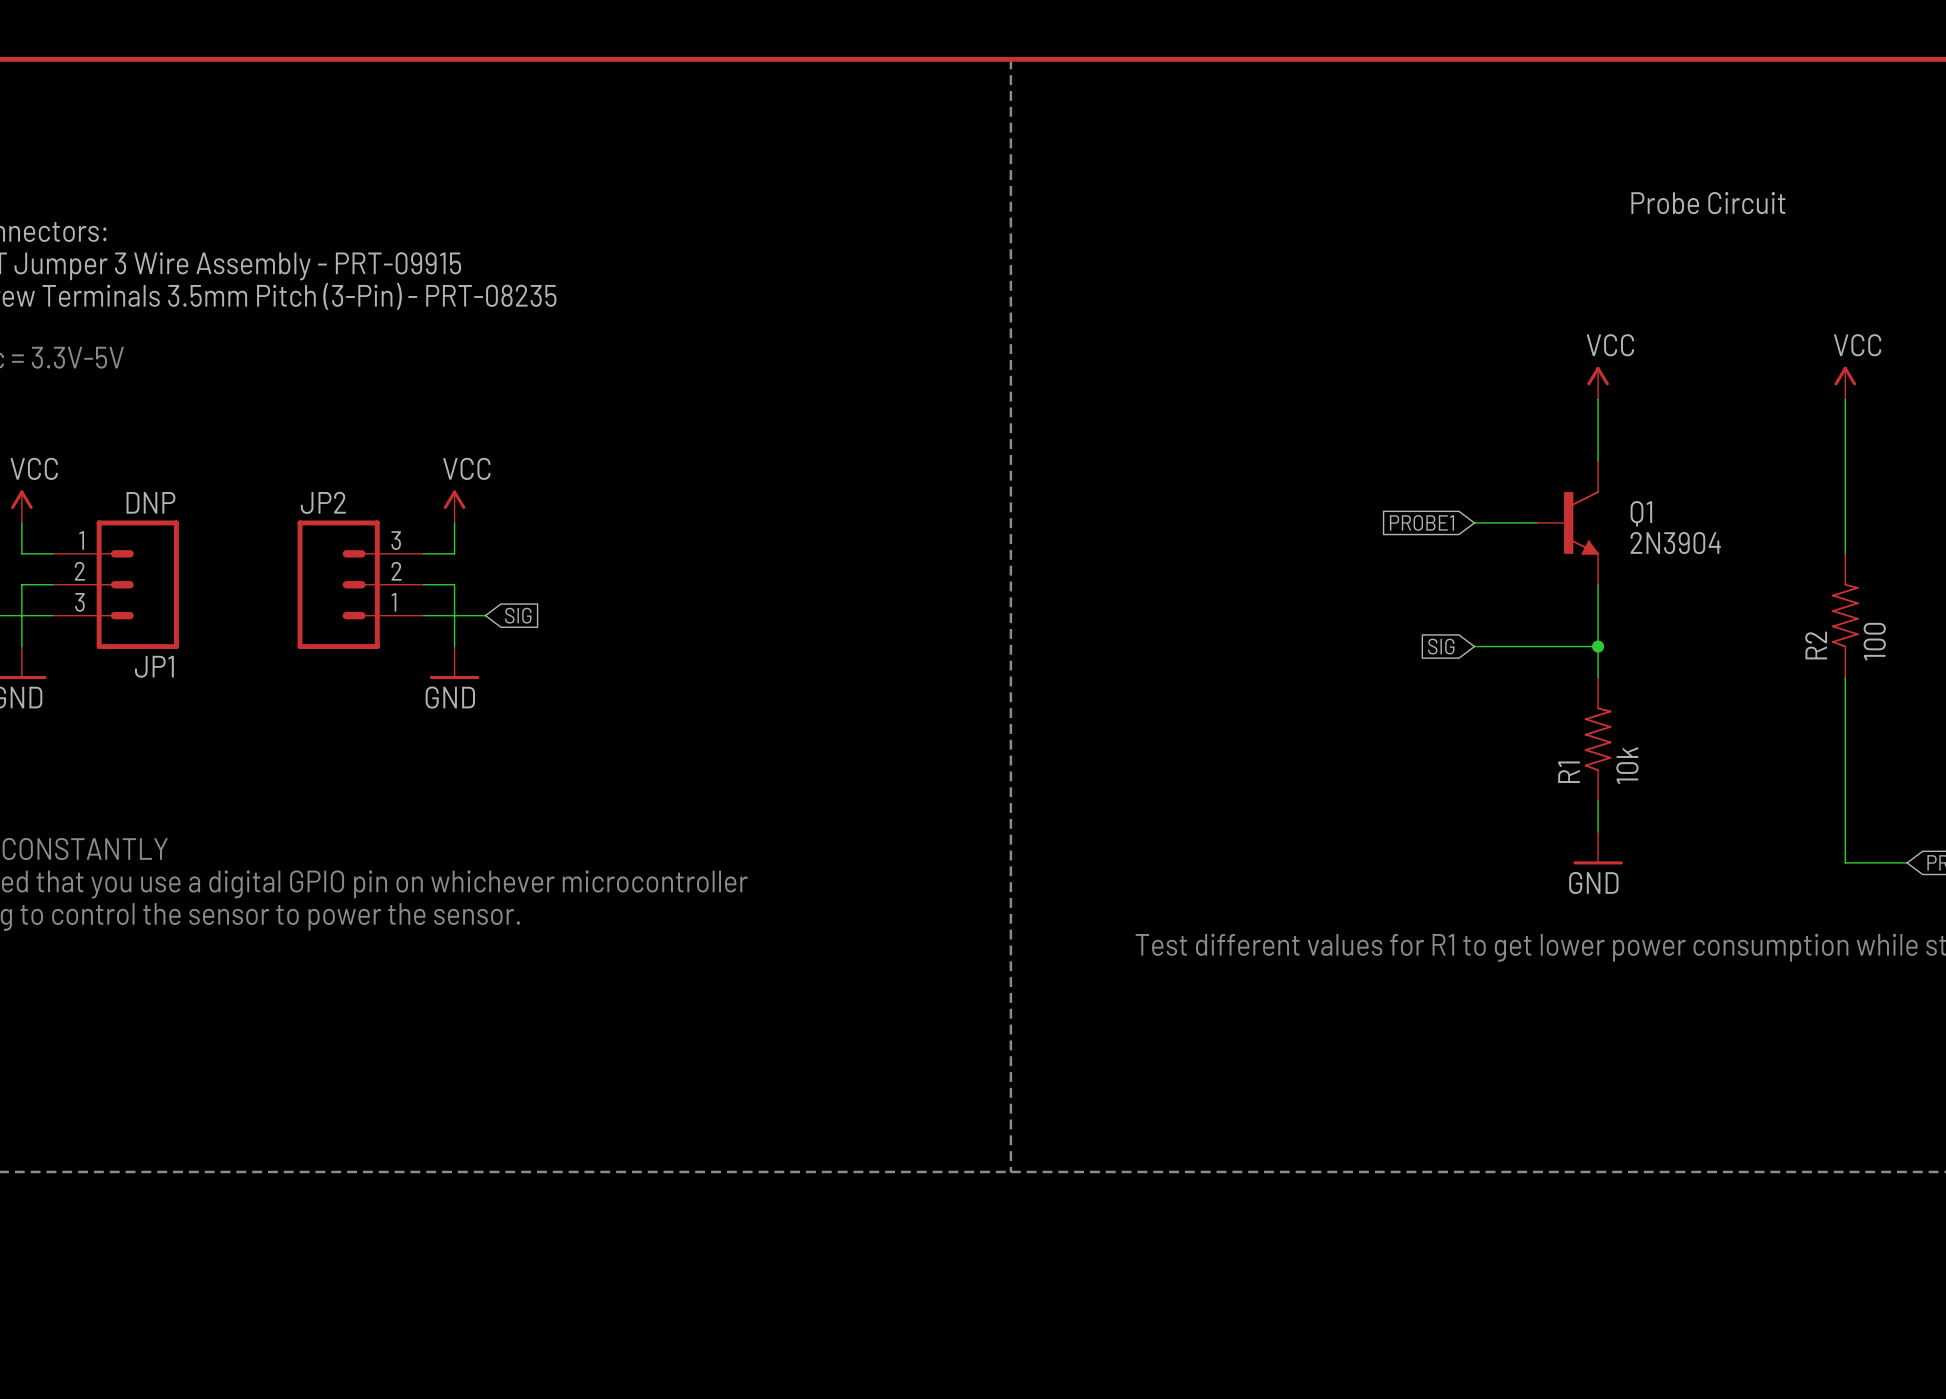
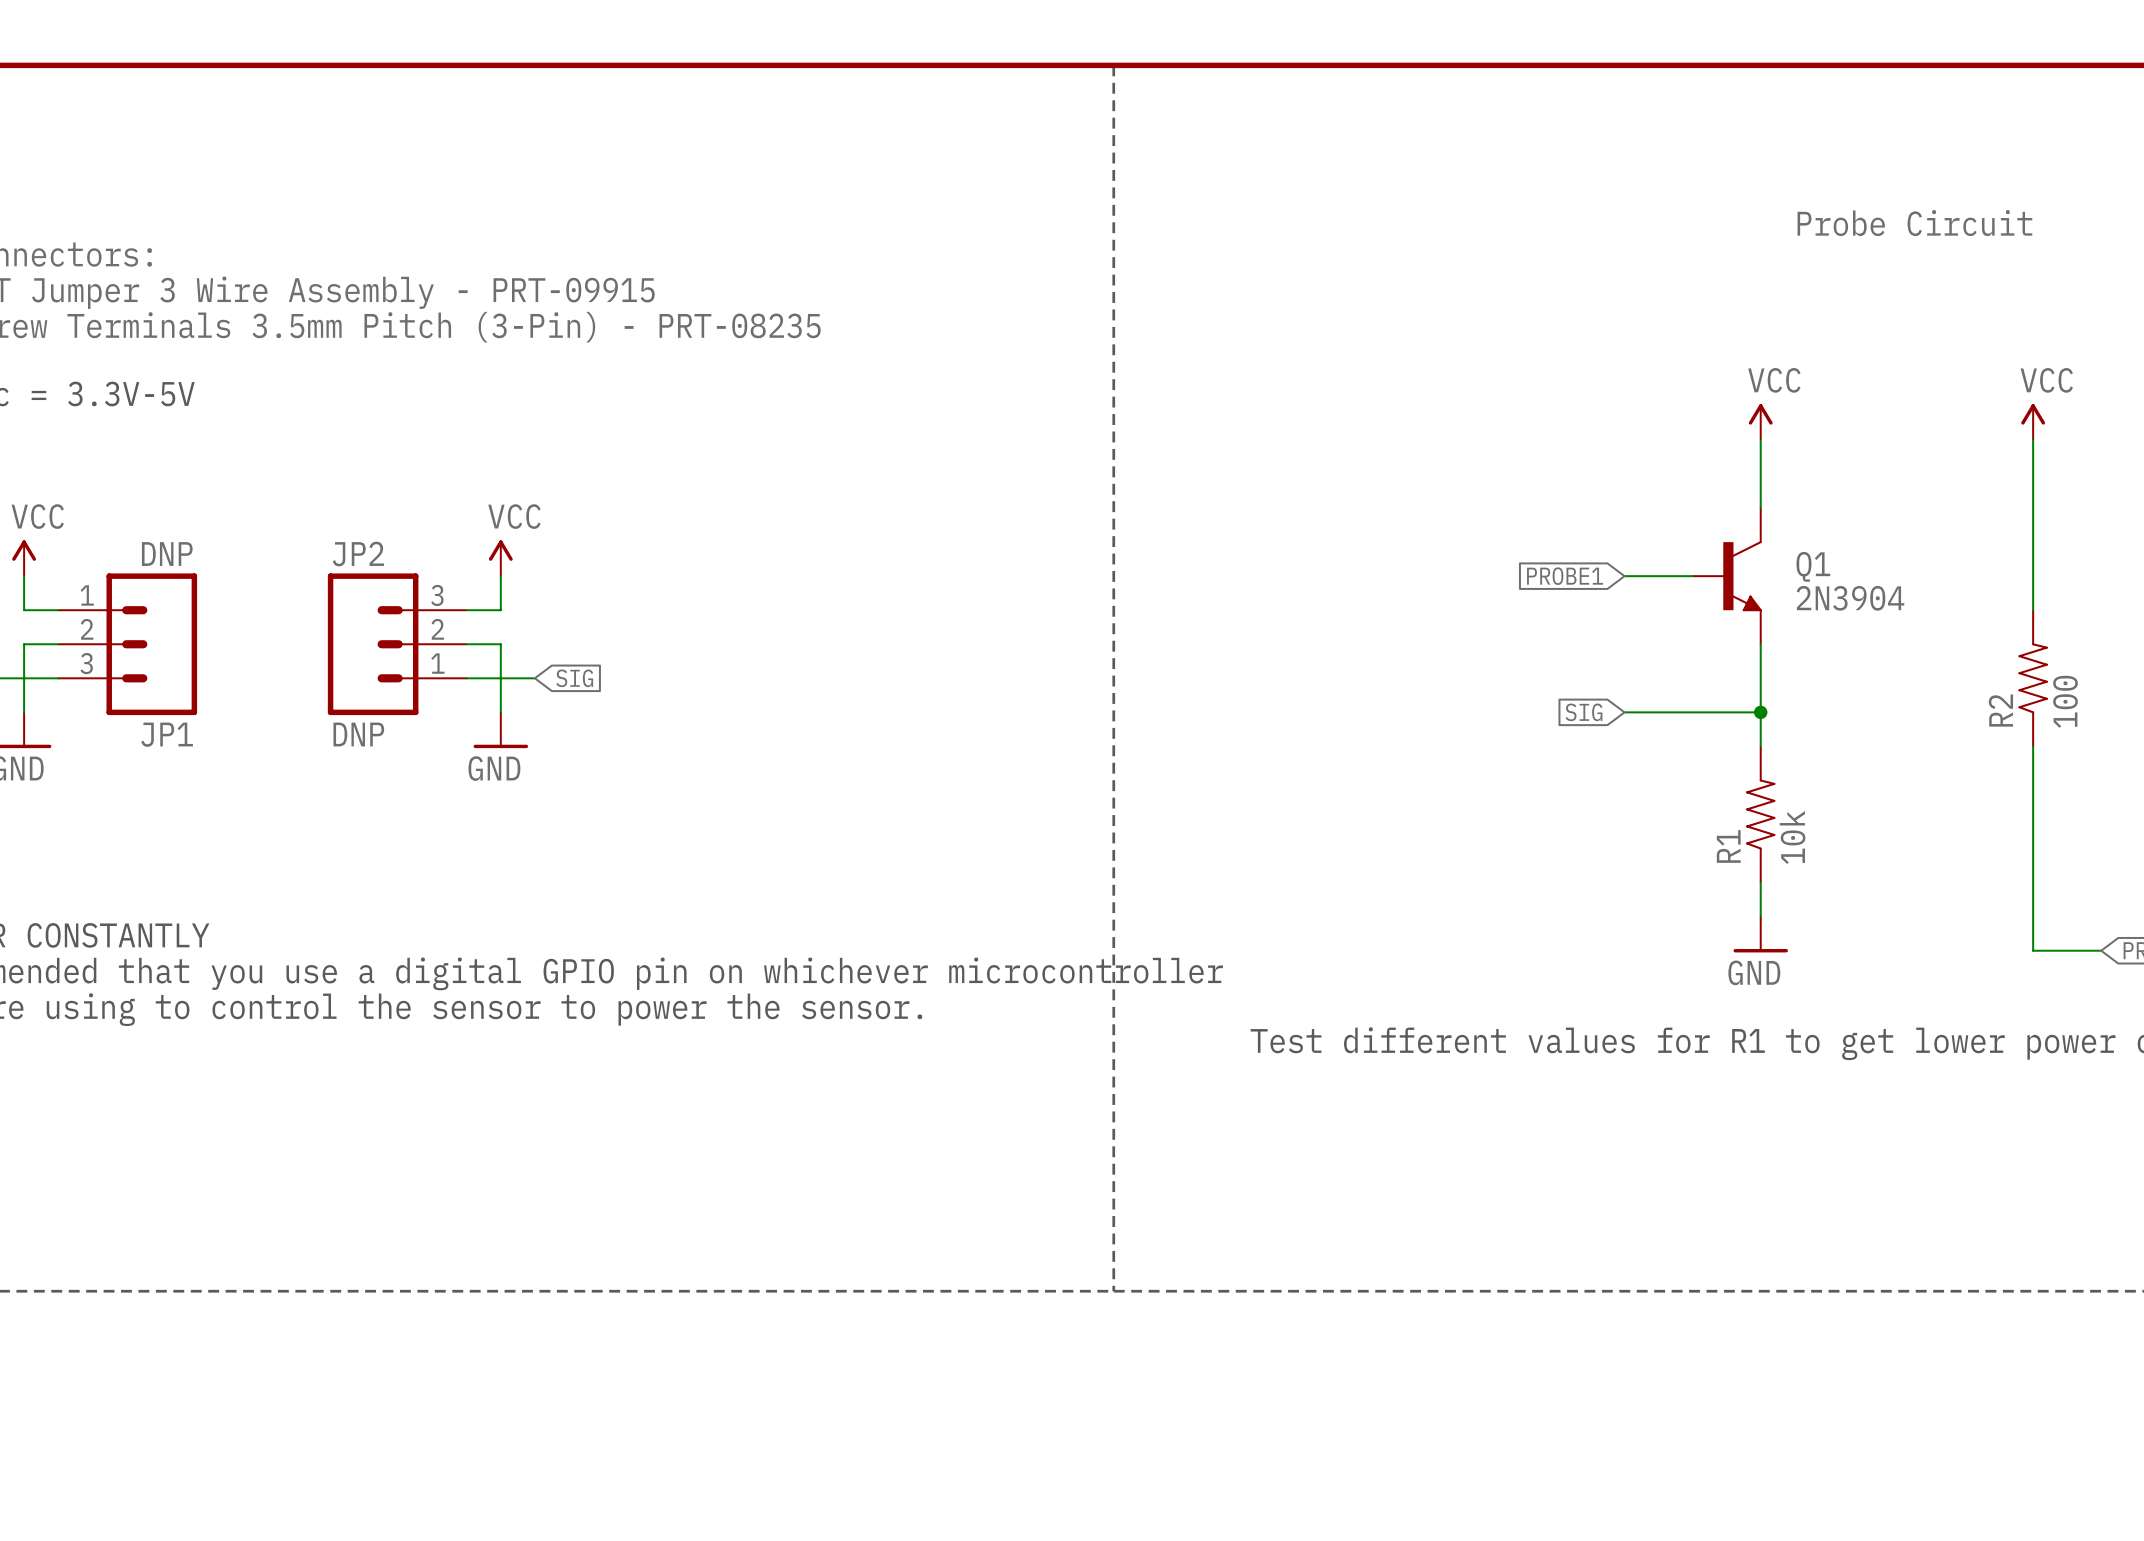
JP2 value: none -> DNP (358, 734)

